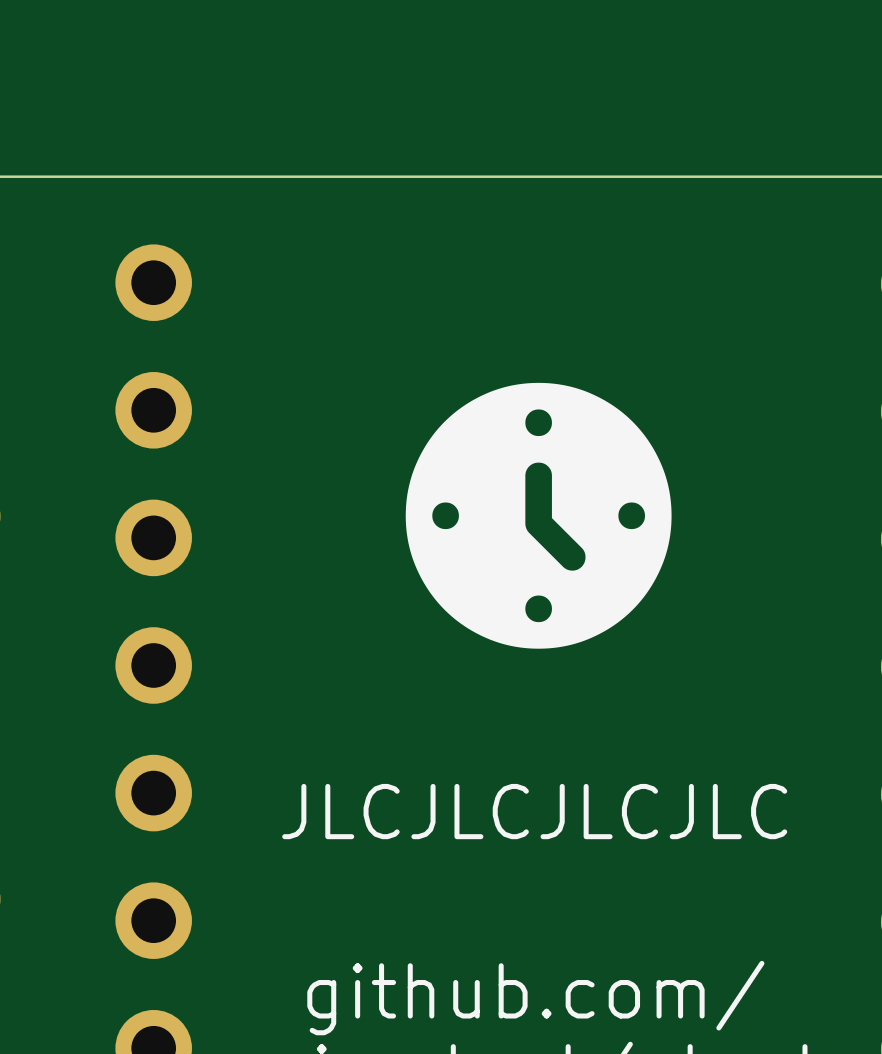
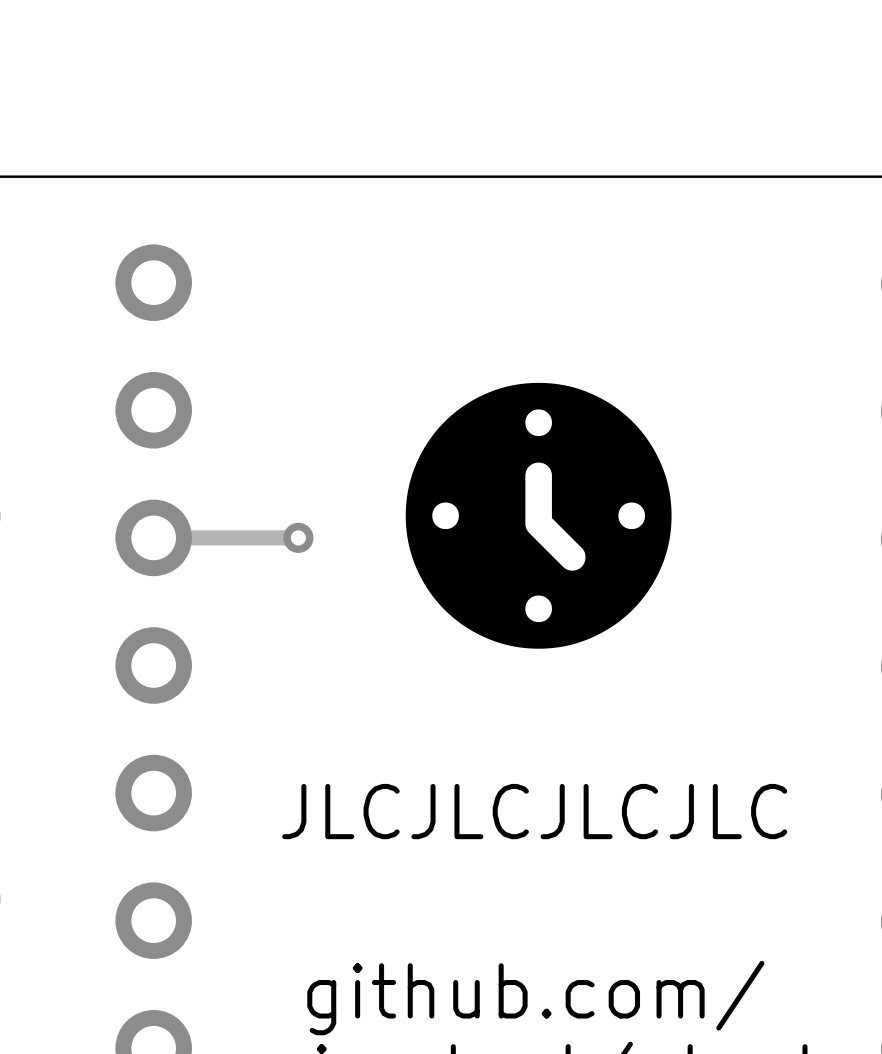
track: none -> (298, 537) (153, 537)
via: none -> (298, 537)

